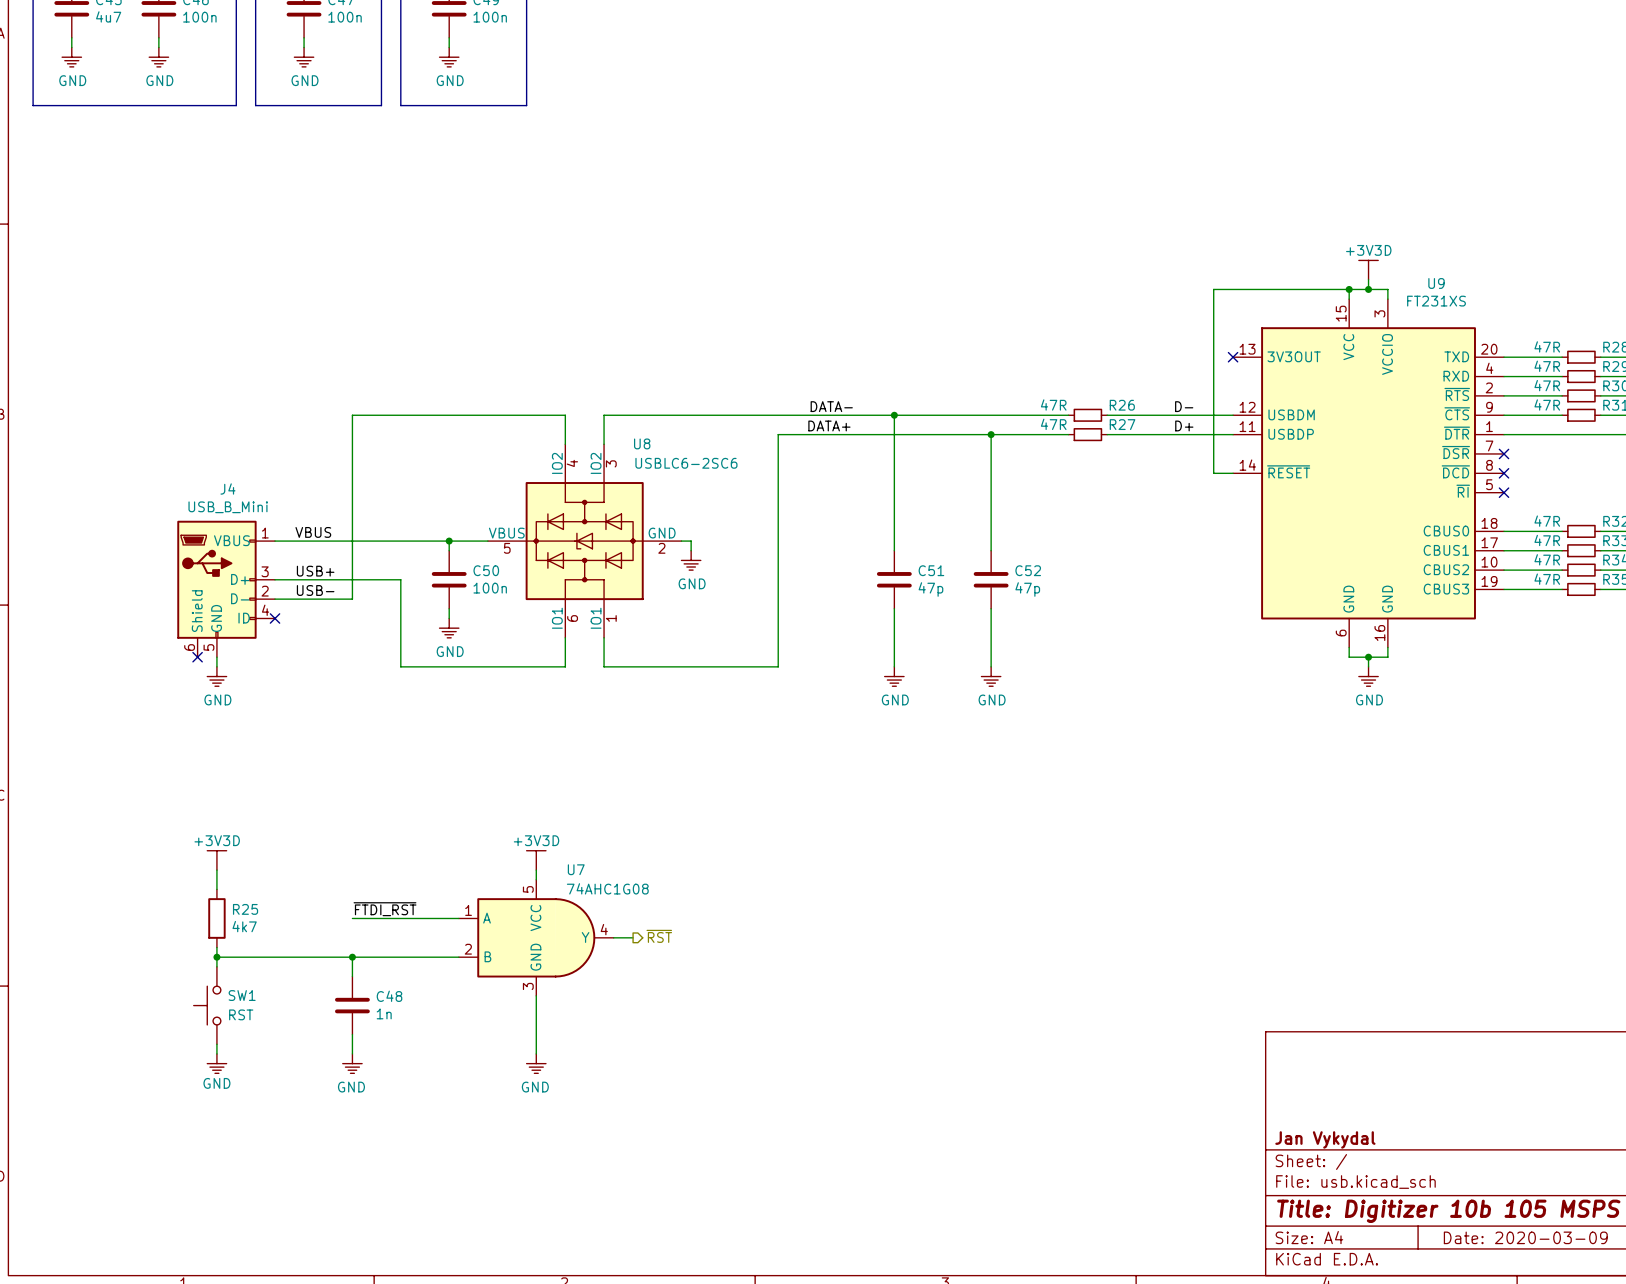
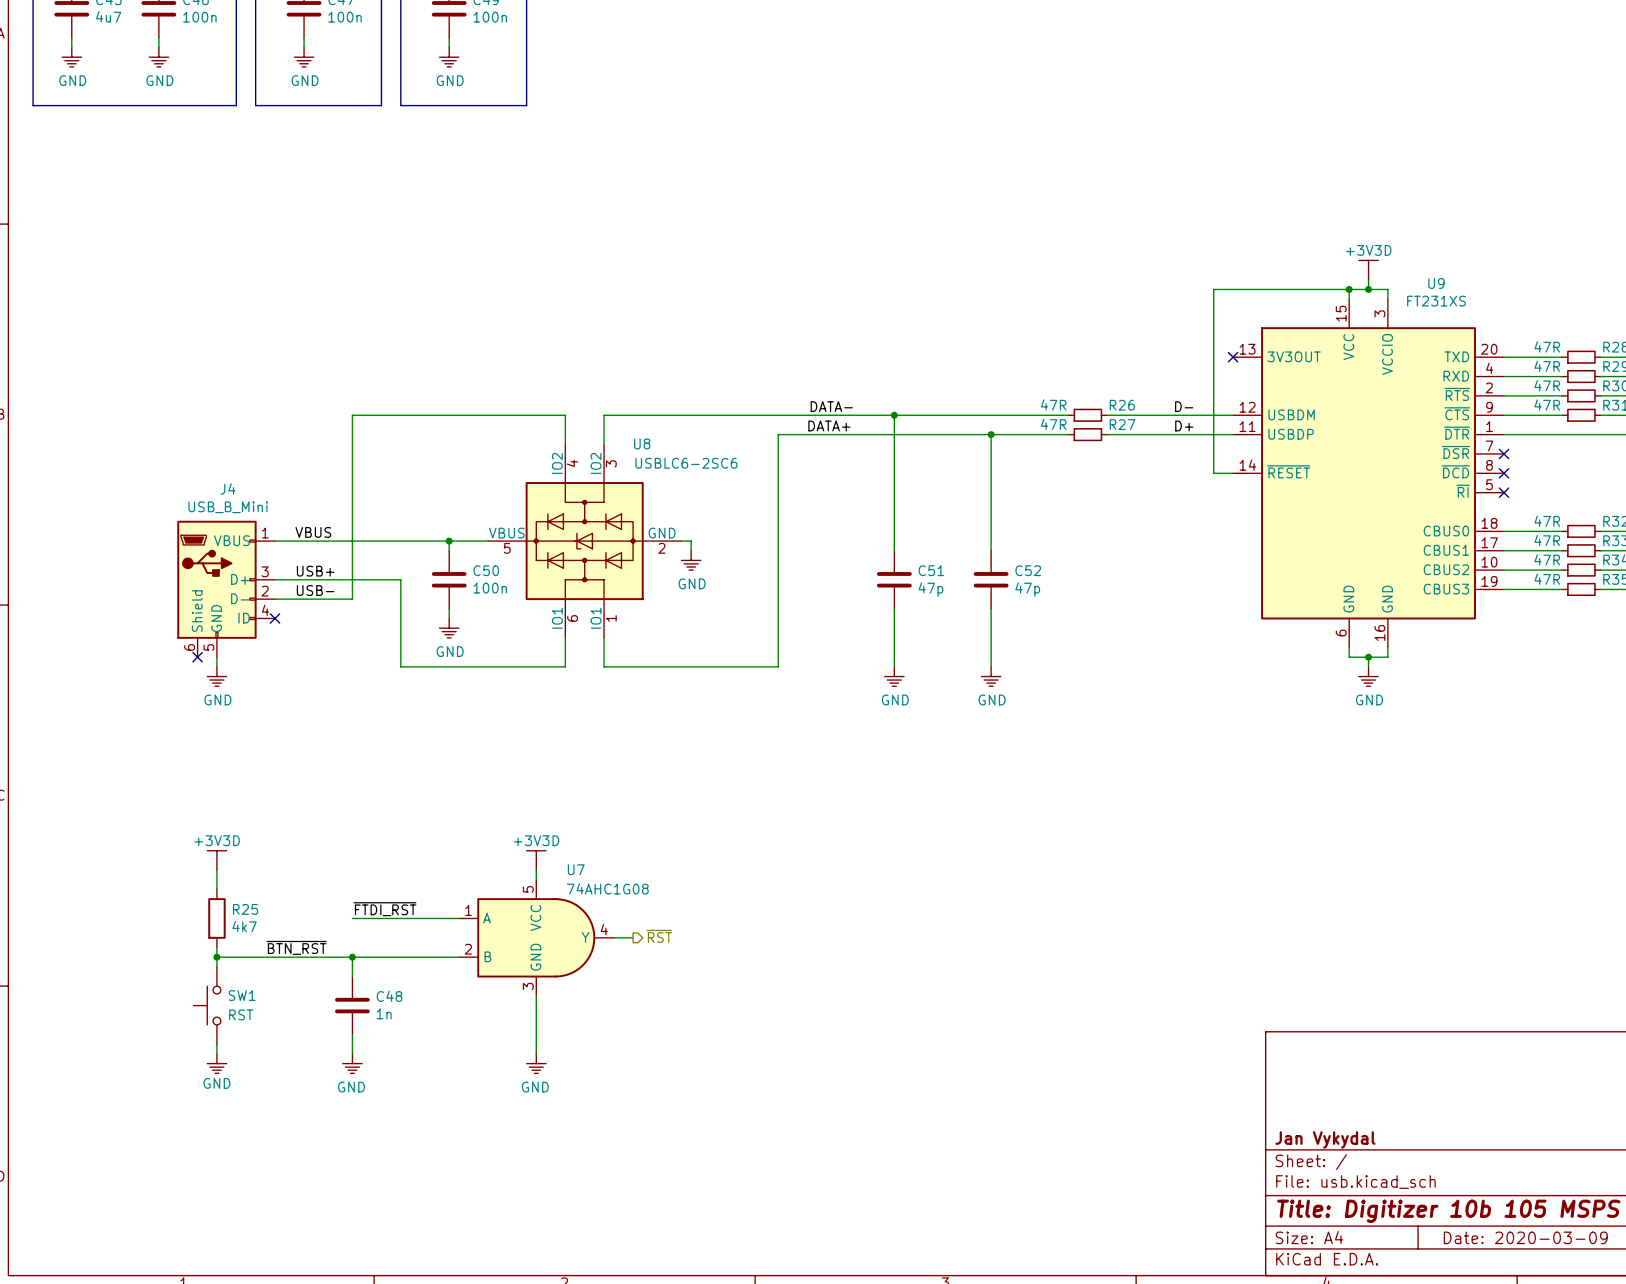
label: none -> ~{BTN_RST} (296, 947)

